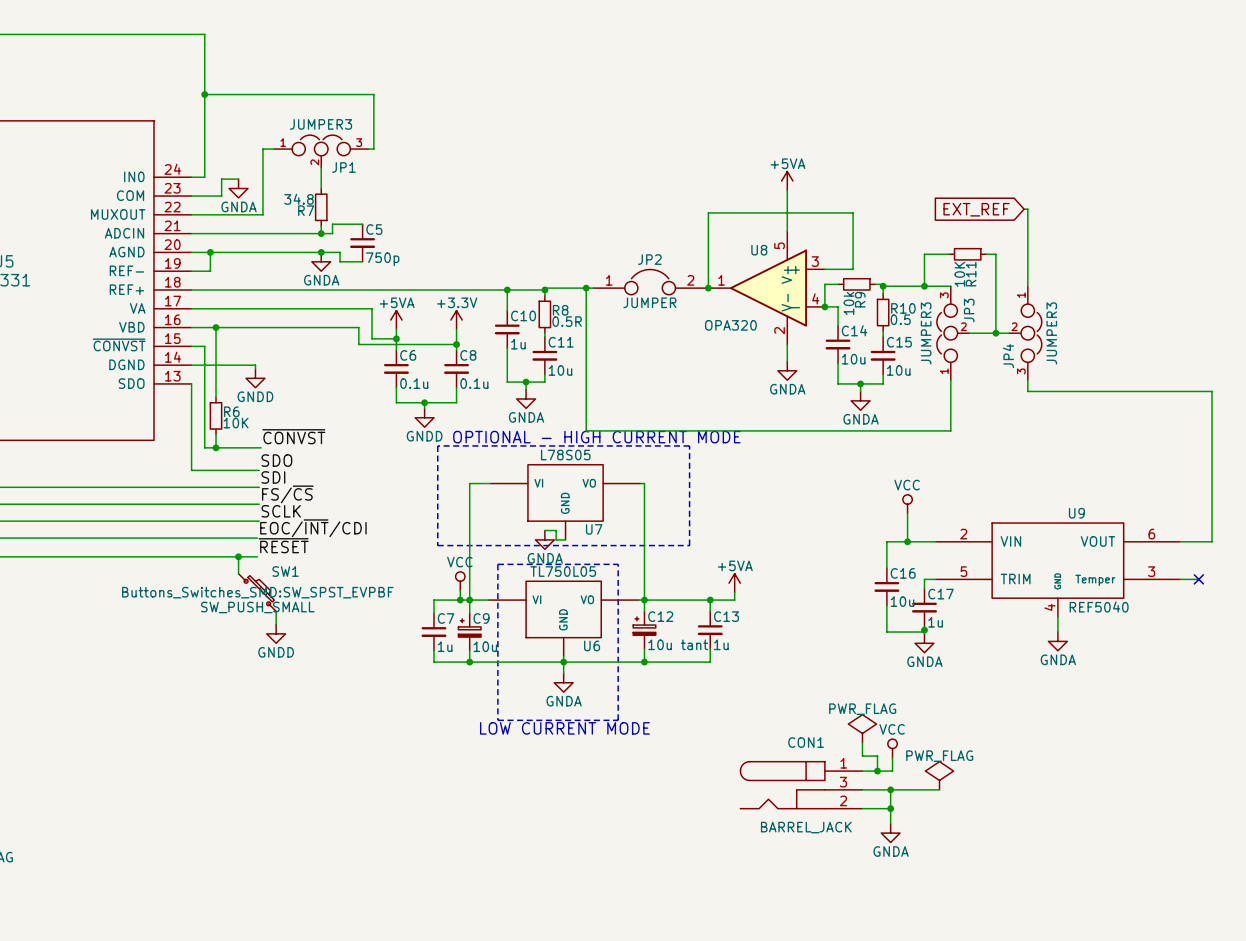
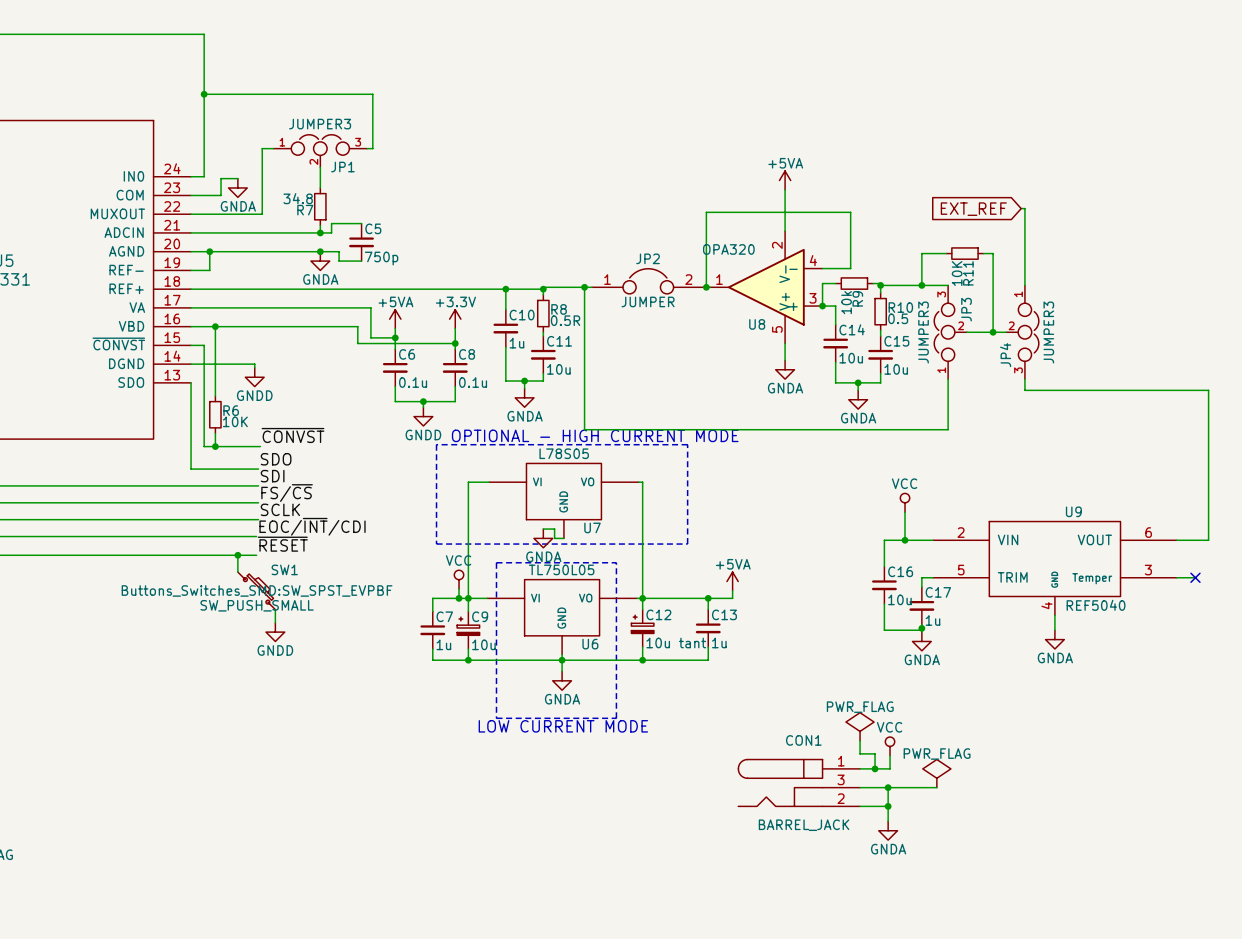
U8 flip: as is (768, 288) -> up-down (766, 287)

